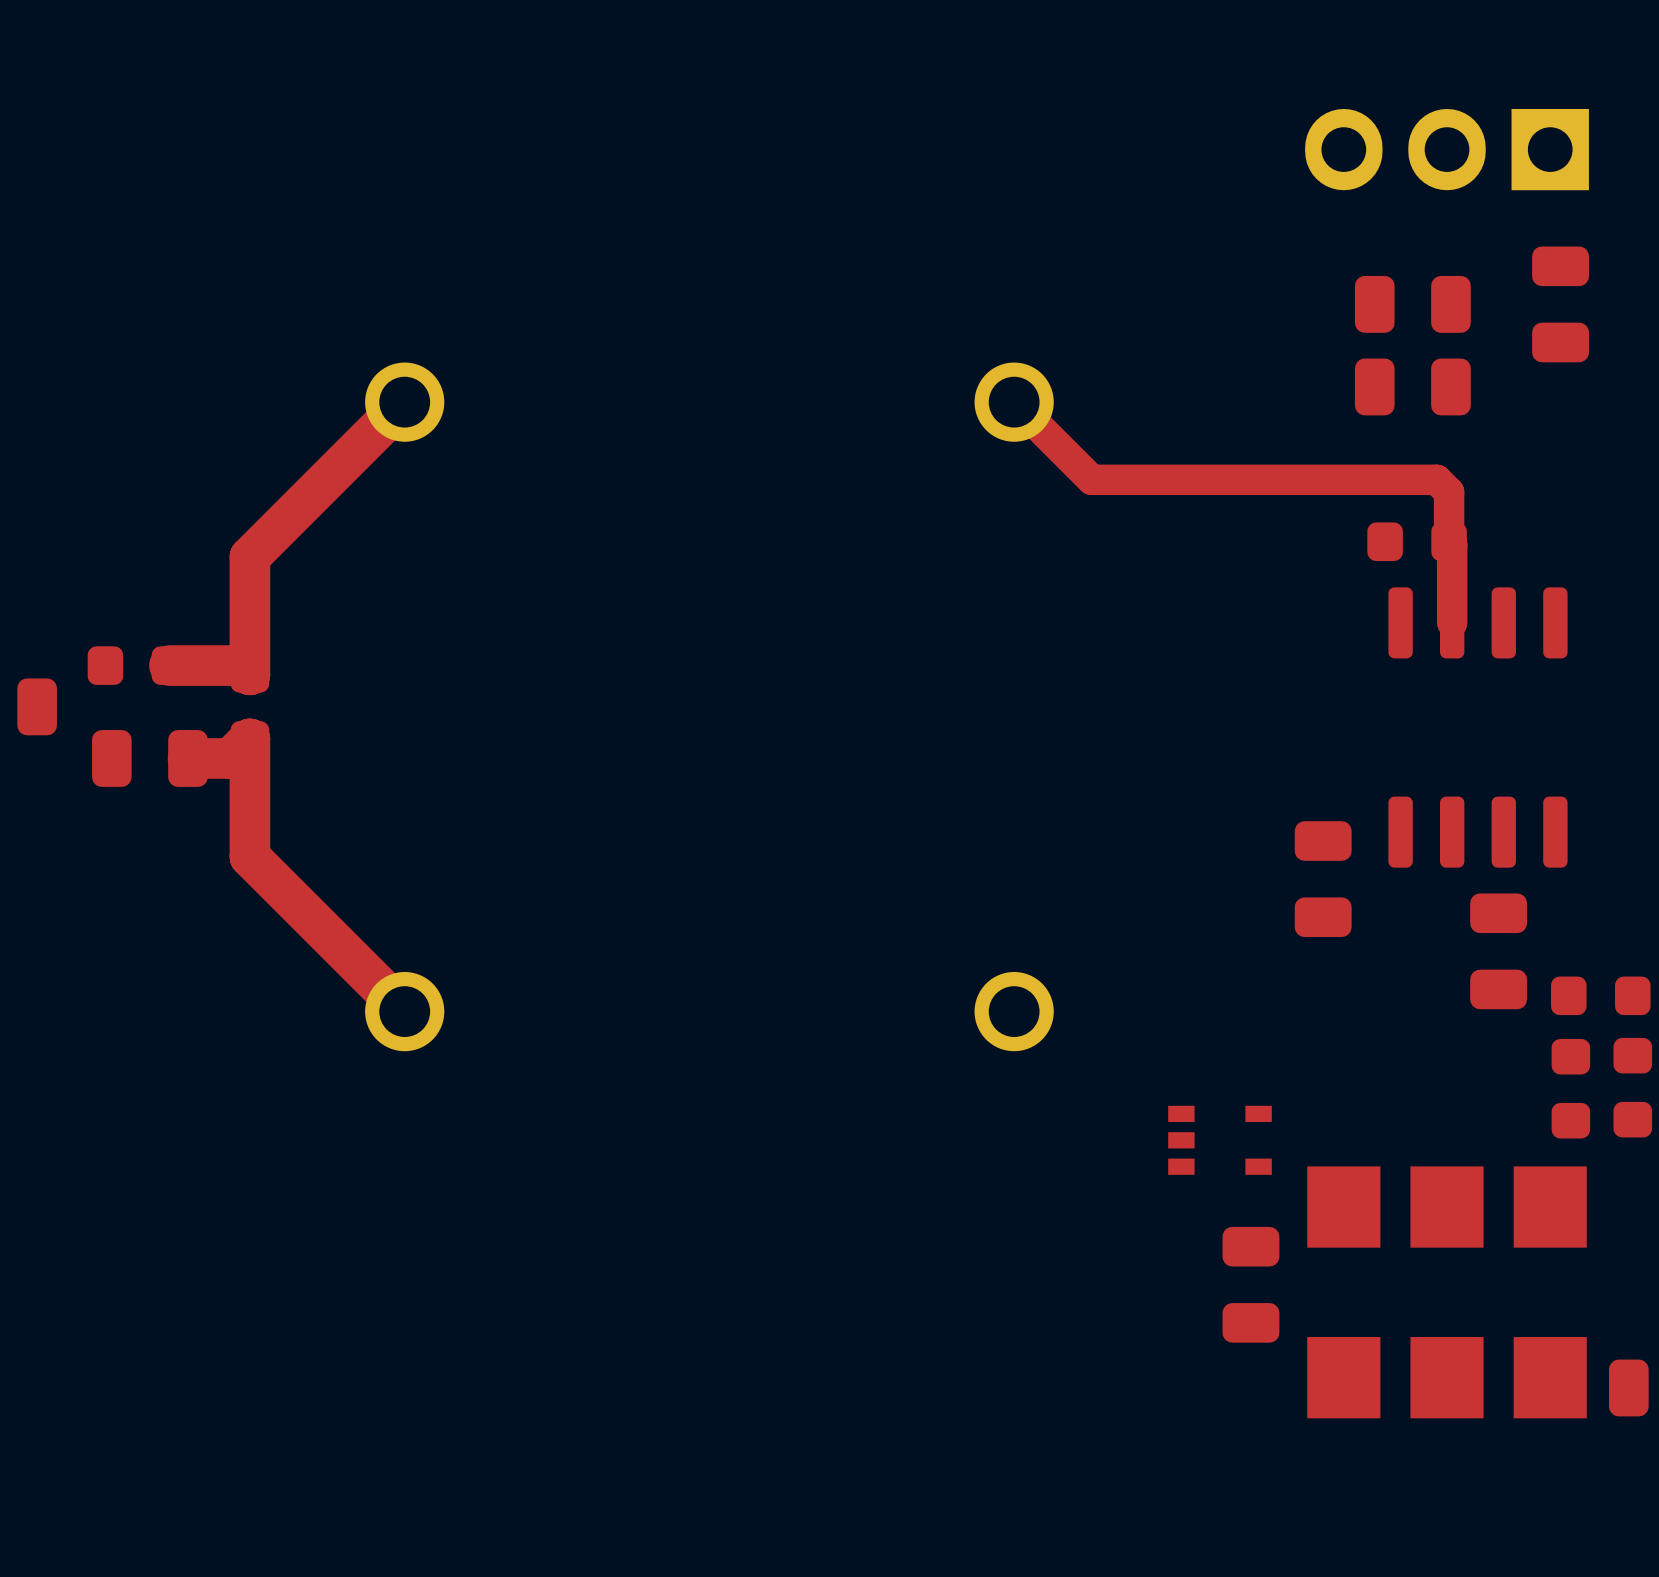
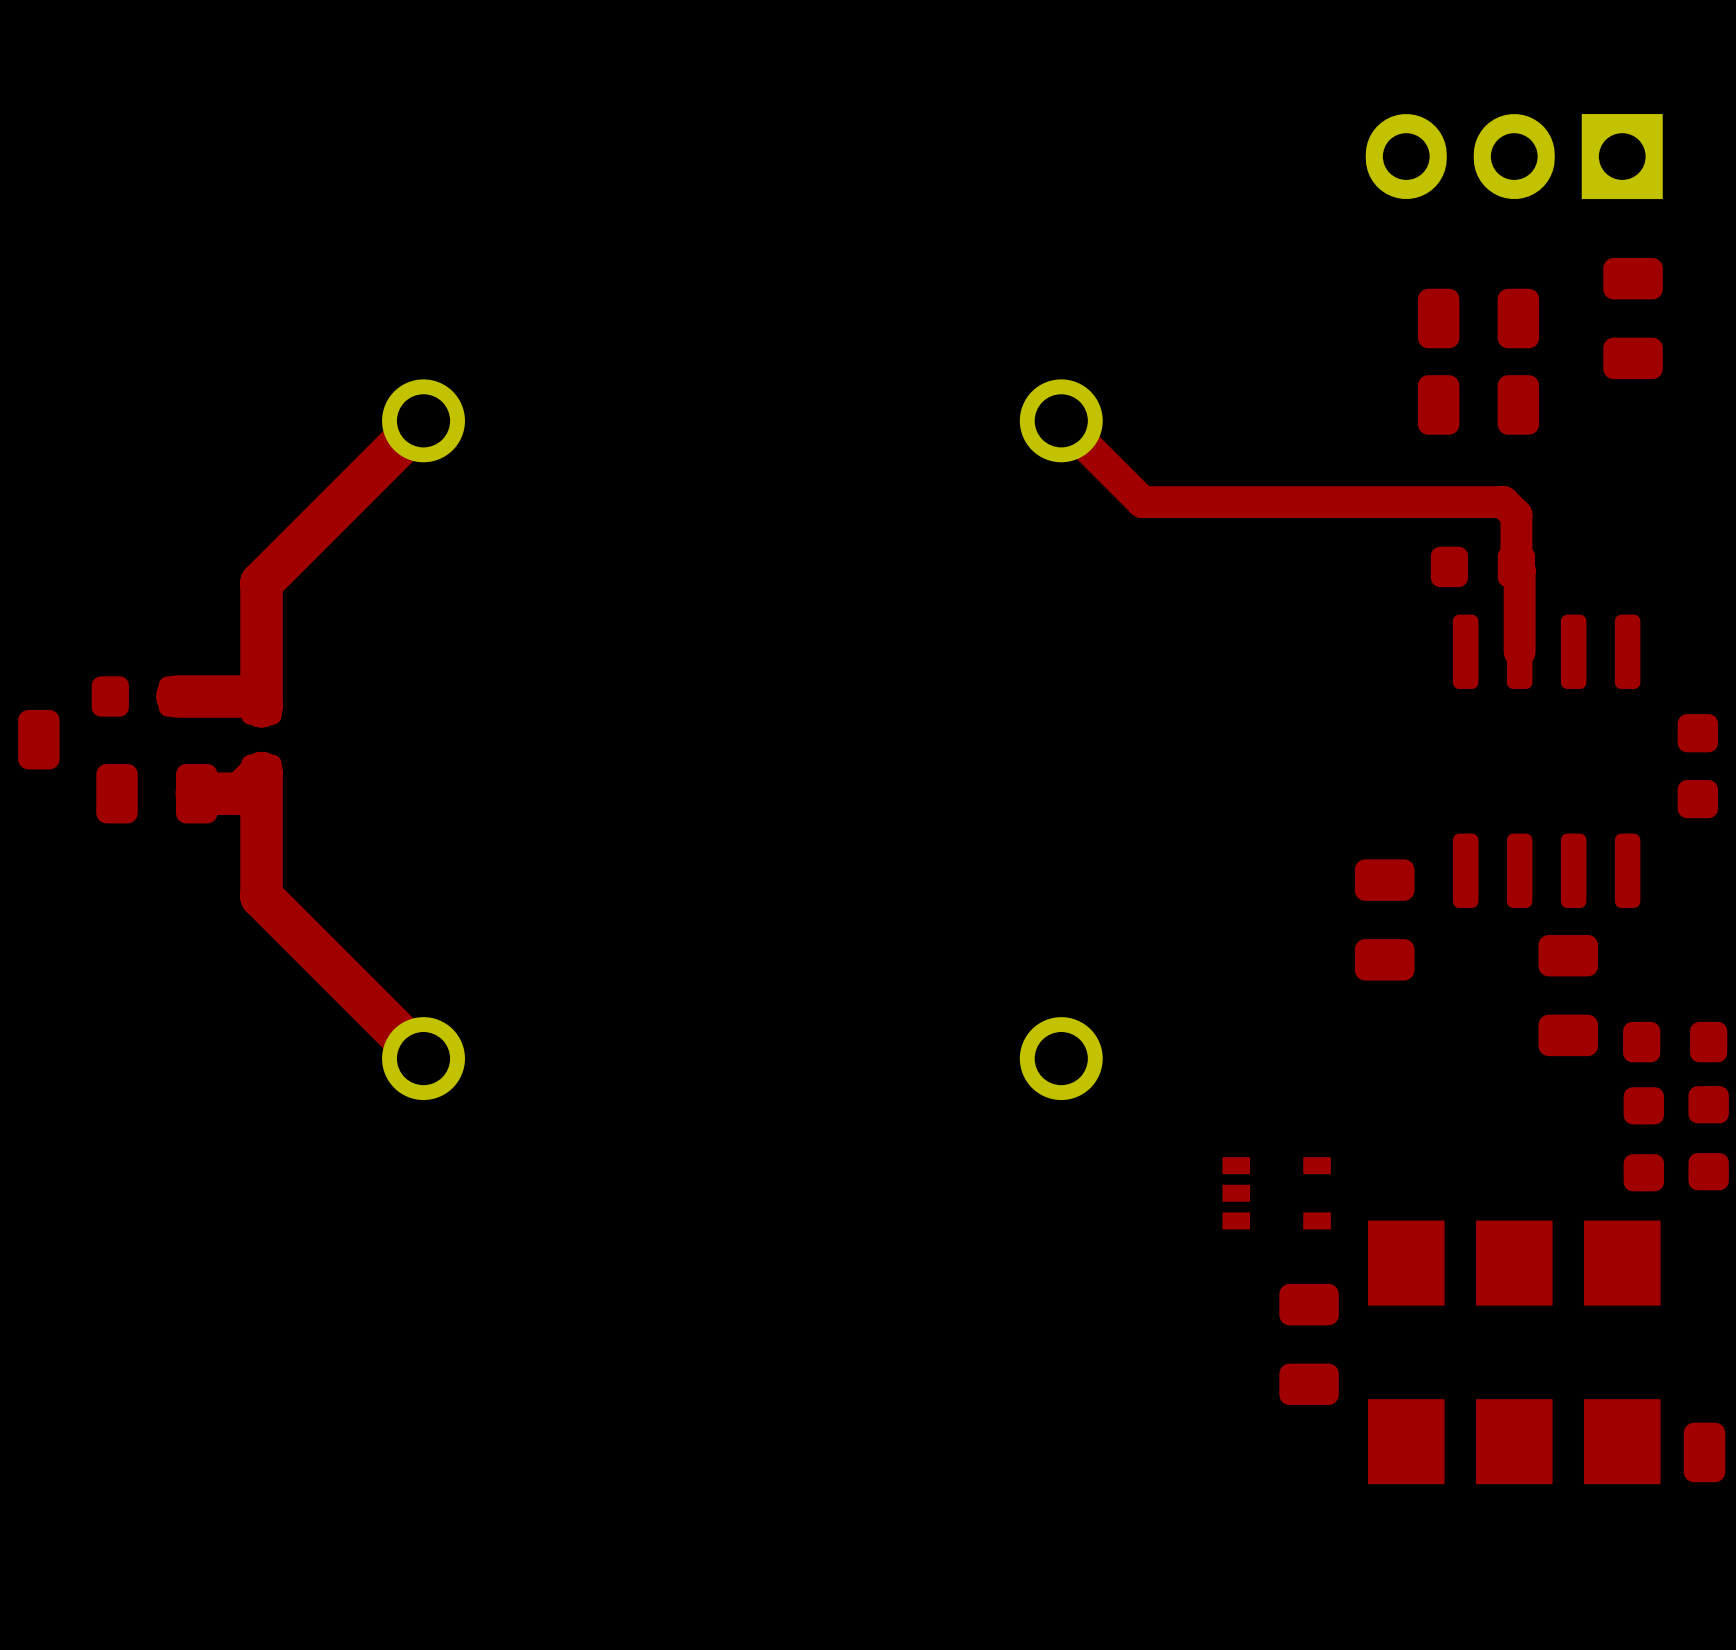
part: none -> (1697, 766)

